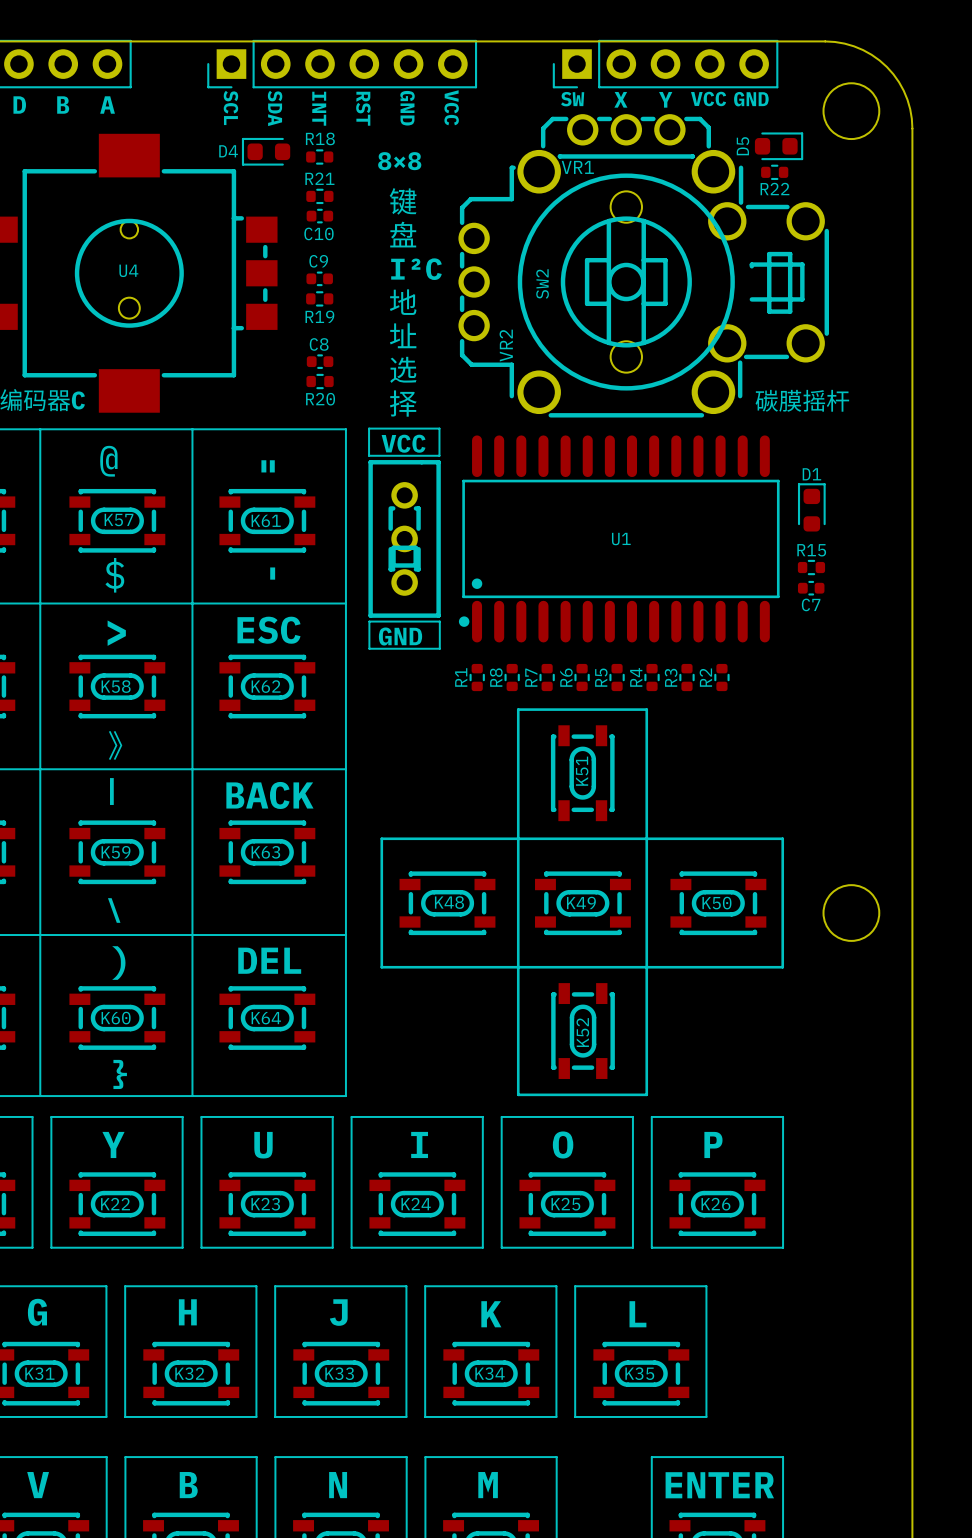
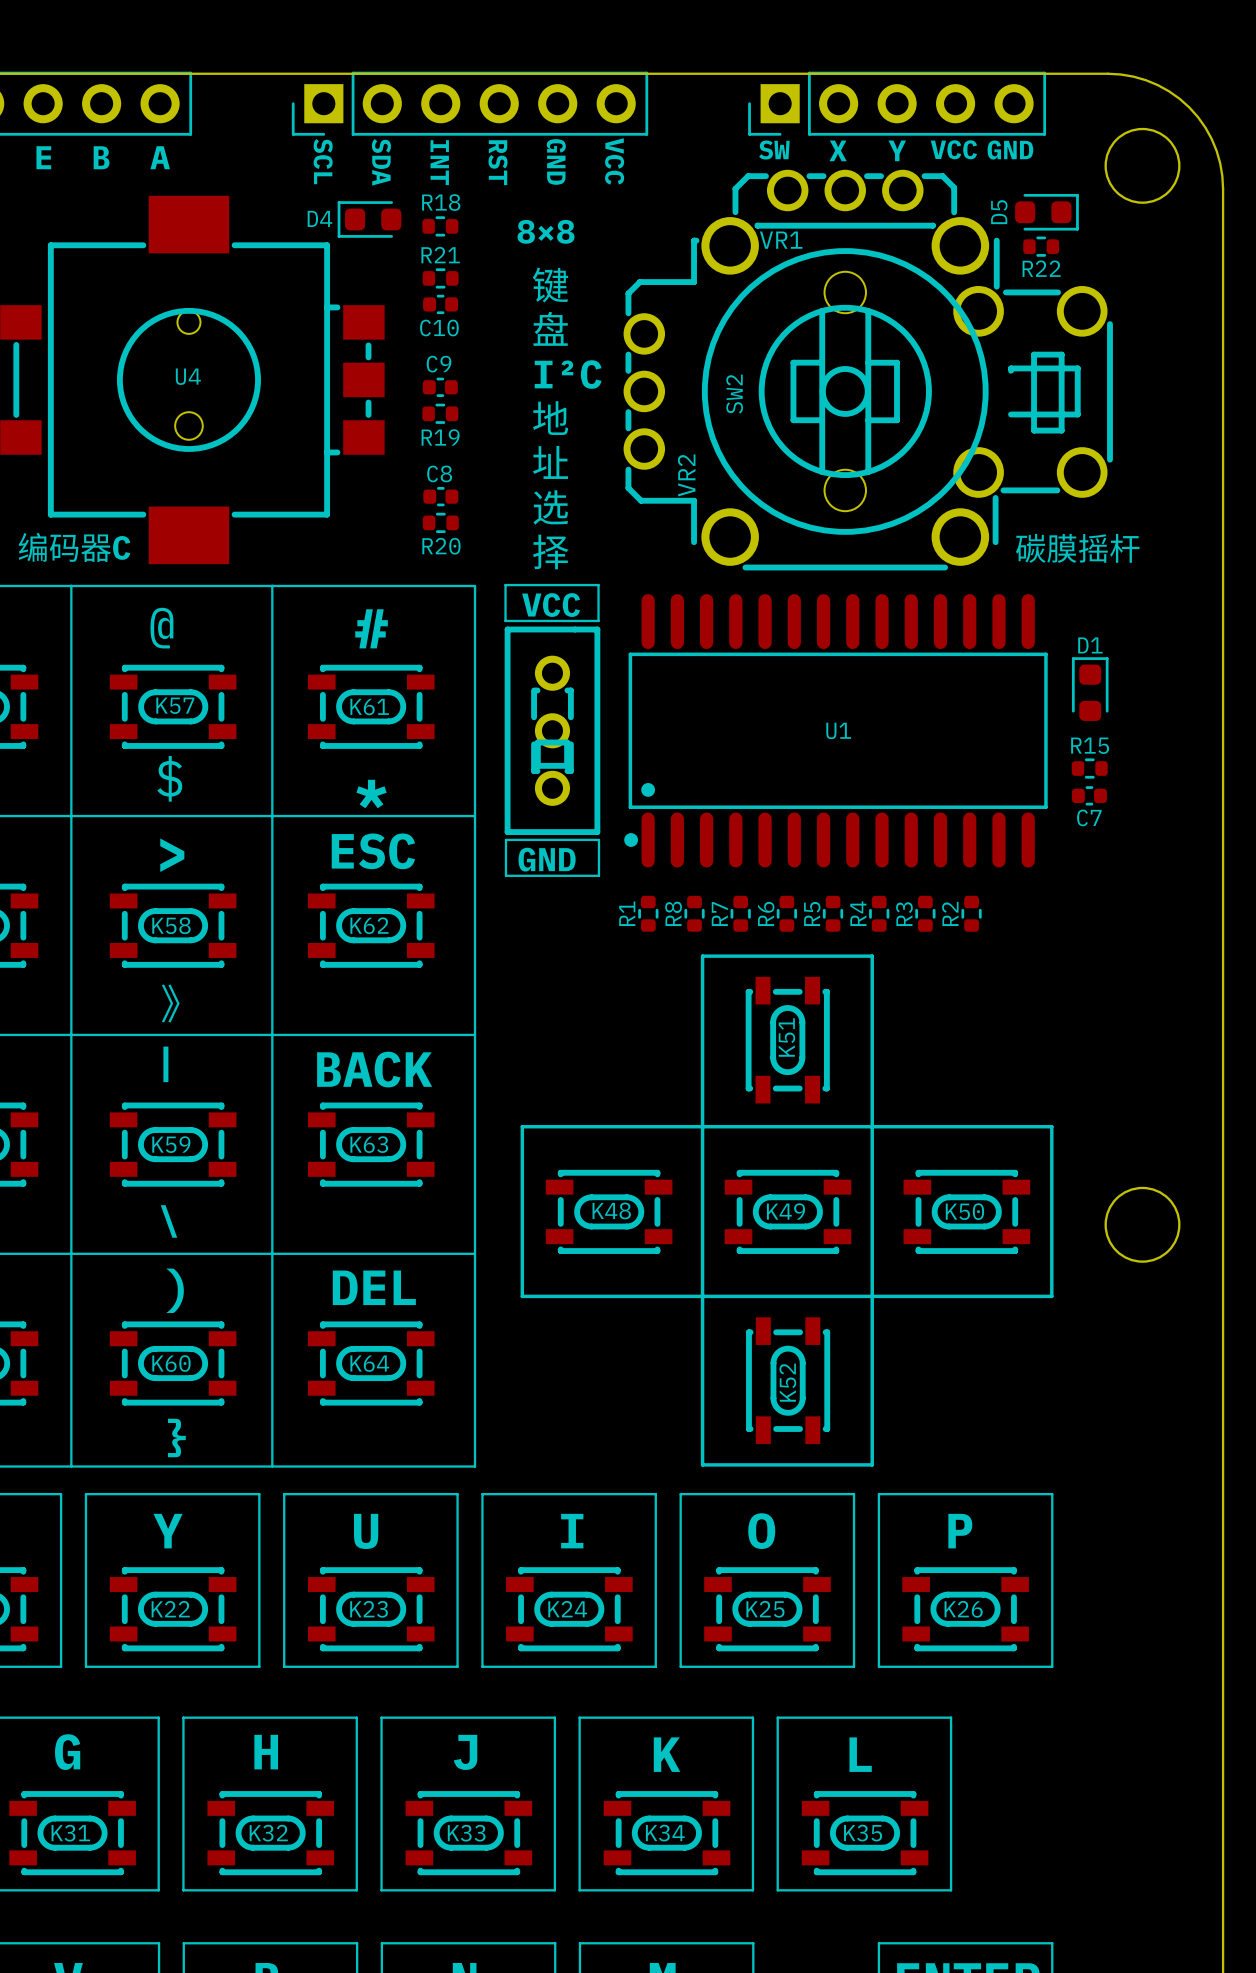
text: D (19, 105) -> E (43, 157)
text: " (268, 466) -> # (371, 628)
text: ' (272, 573) -> * (371, 794)

